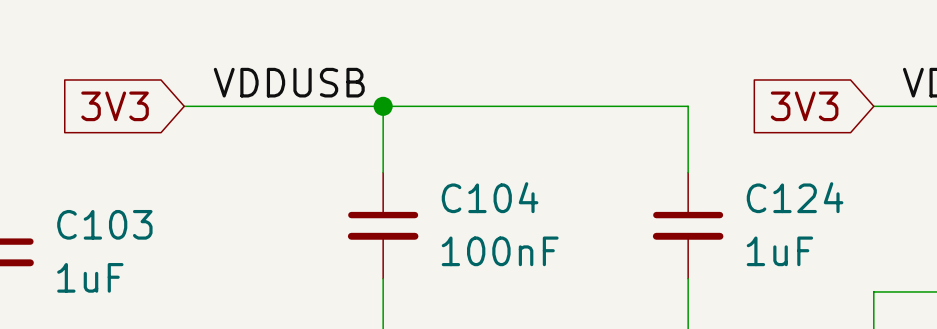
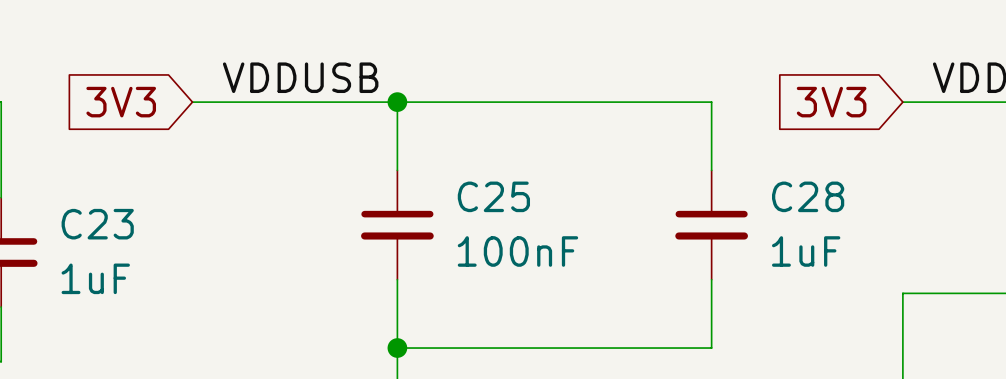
C104 name: C104 (490, 197) -> C25 (493, 196)
C124 name: C124 (795, 197) -> C28 (808, 196)
C103 name: C103 (104, 224) -> C23 (97, 224)

